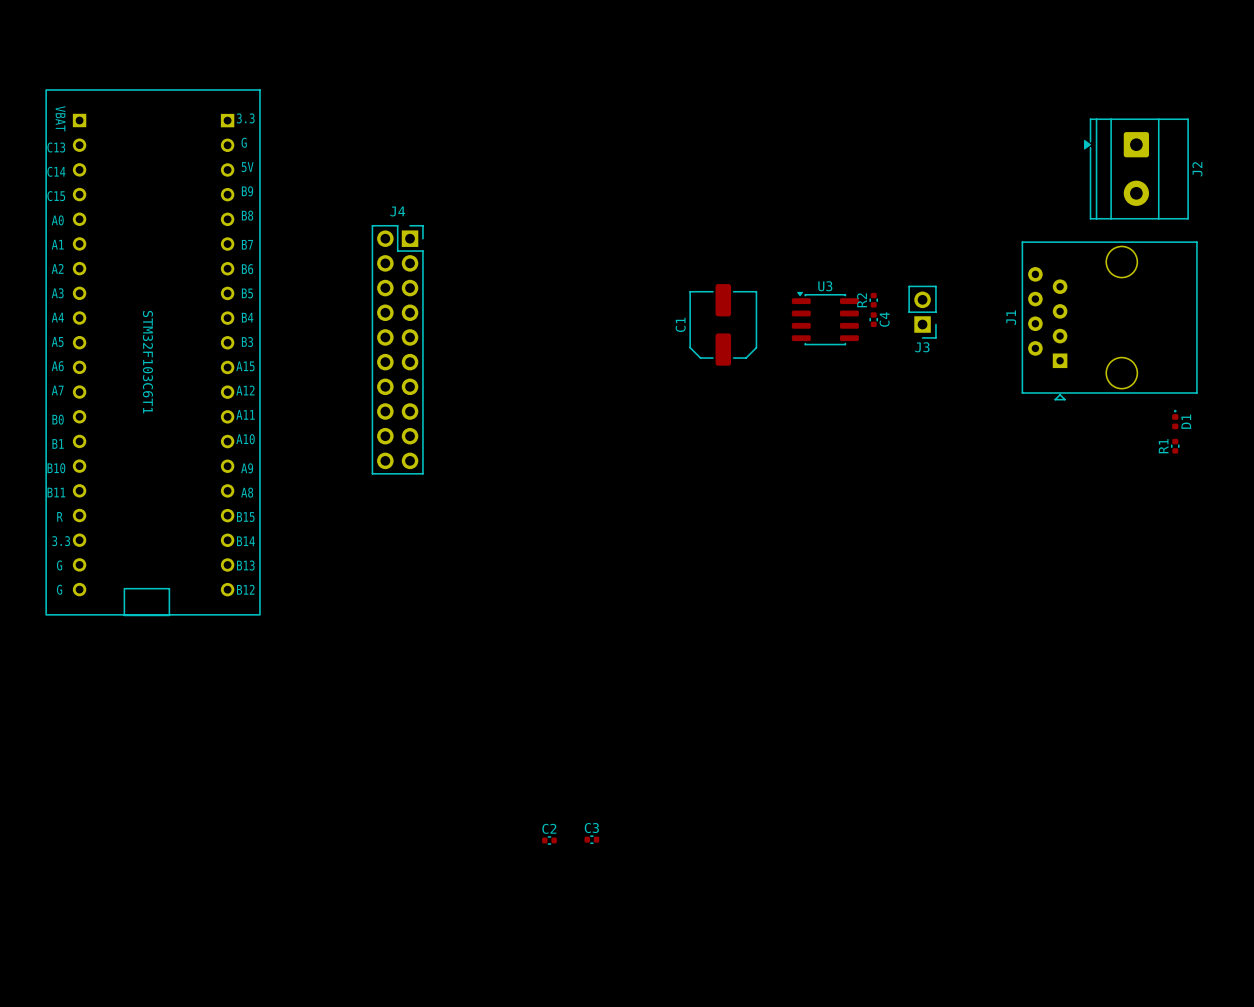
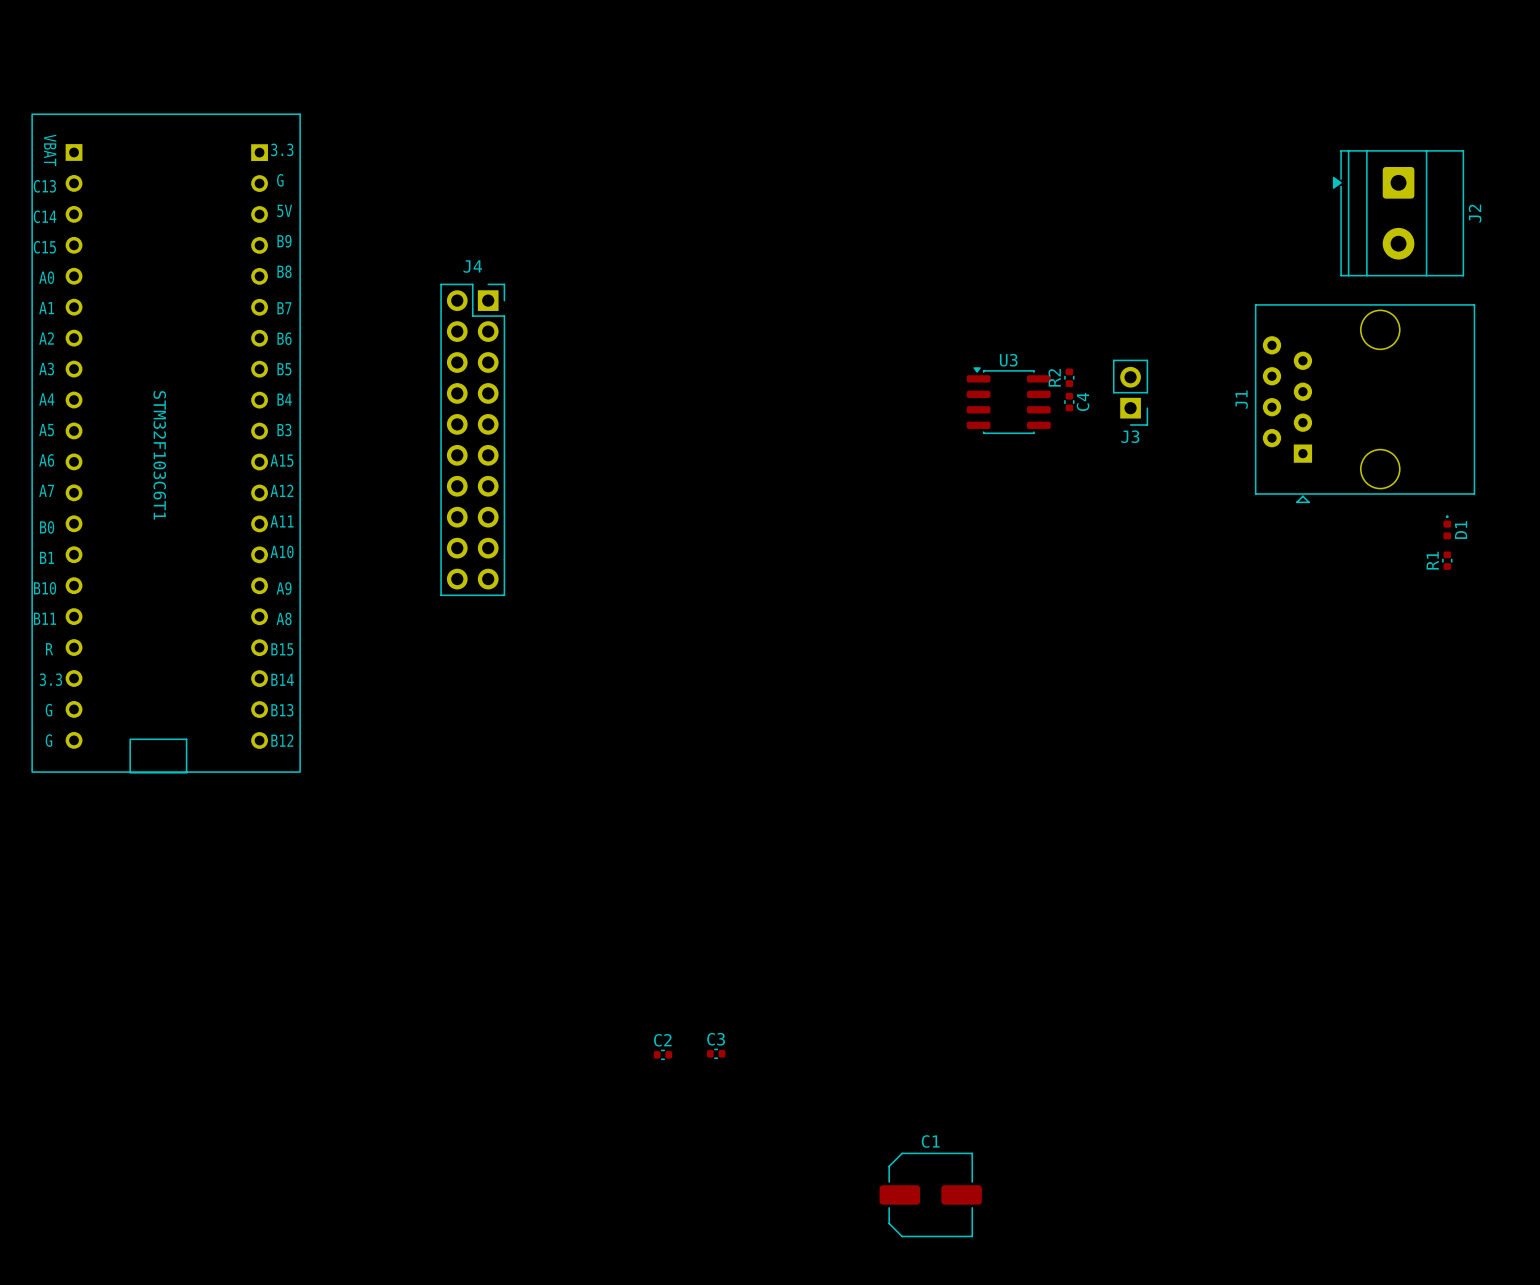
C1 rotation: 0° (723, 324) -> 90° clockwise (930, 1194)
C1 position: (723, 324) -> (930, 1194)

